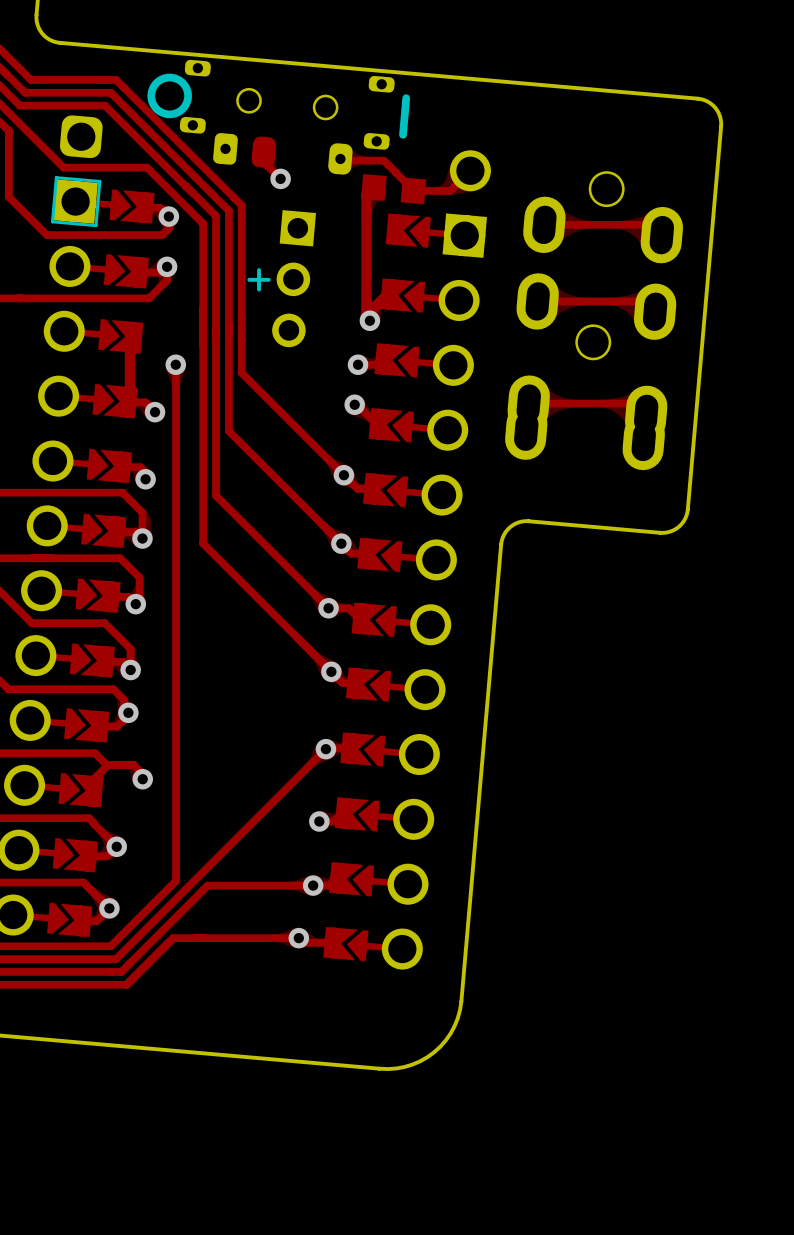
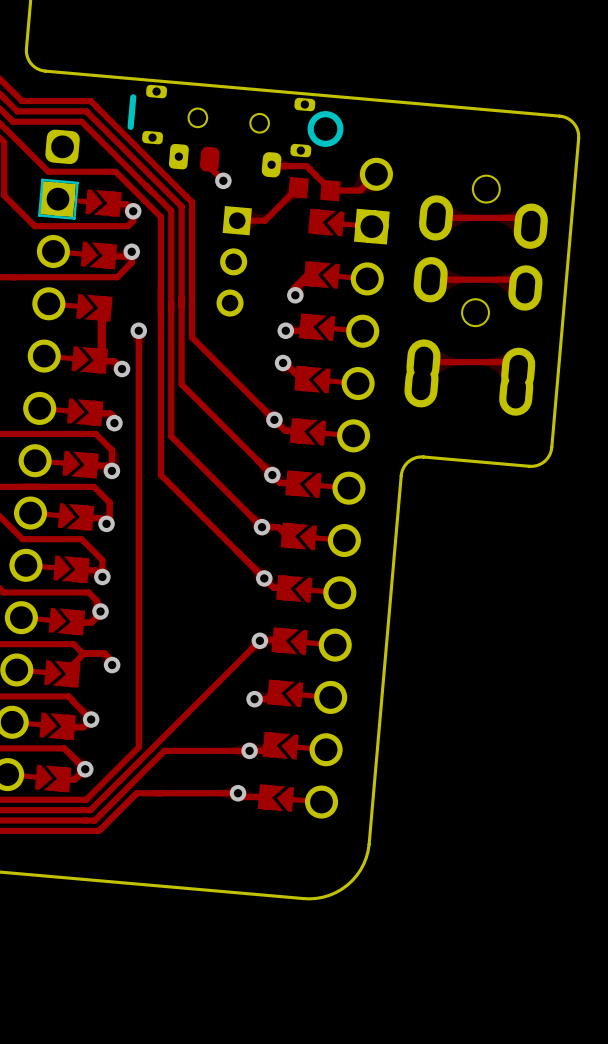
part footprint: [147, 59, 411, 175] -> [127, 84, 344, 178]
track: none -> (303, 182) (265, 220) (237, 220)
track: (373, 187) (366, 194) (366, 317) (369, 320) -> none
text: + (259, 279) -> none

